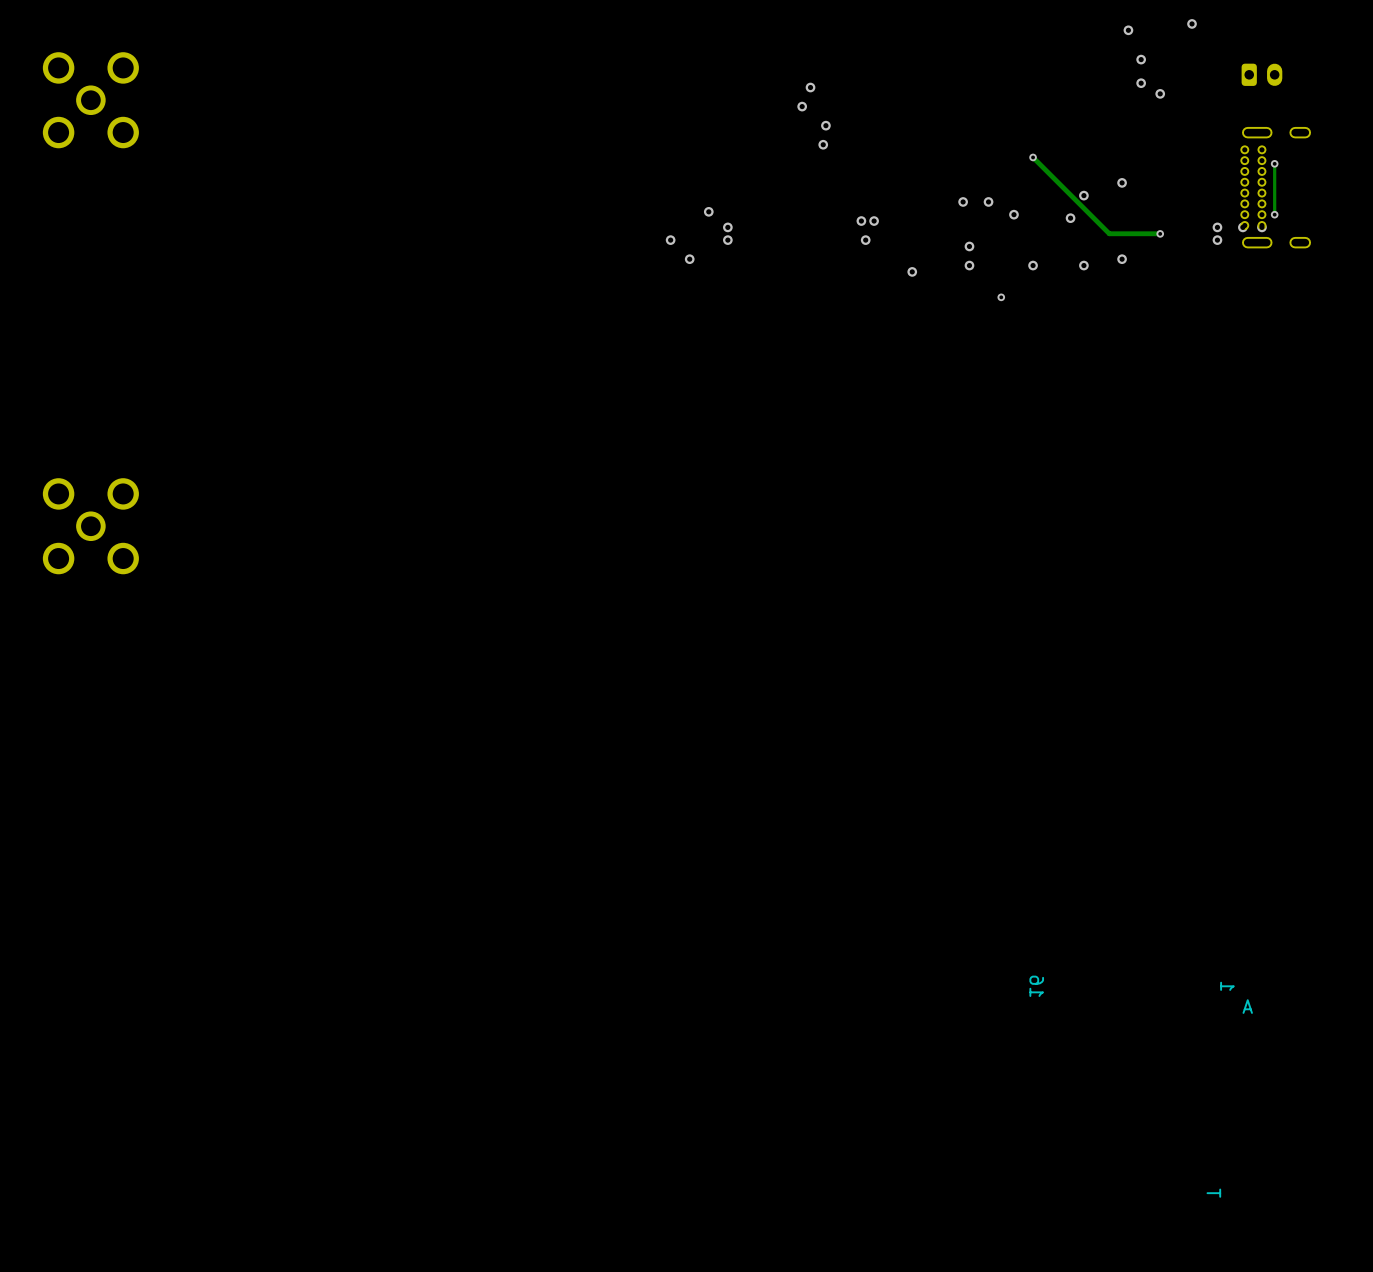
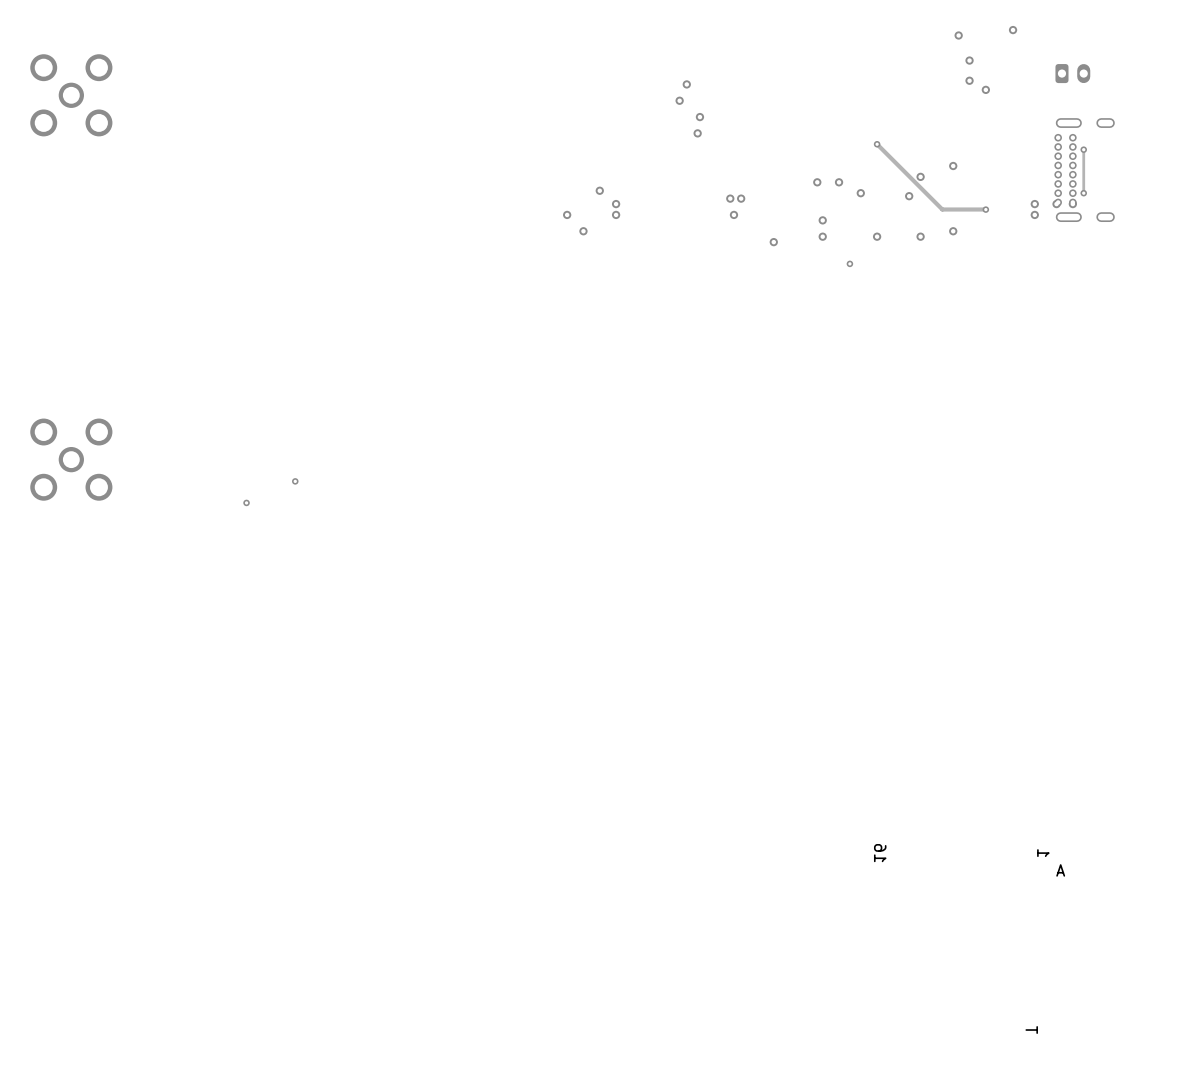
via: none -> (295, 481)
via: none -> (246, 502)

